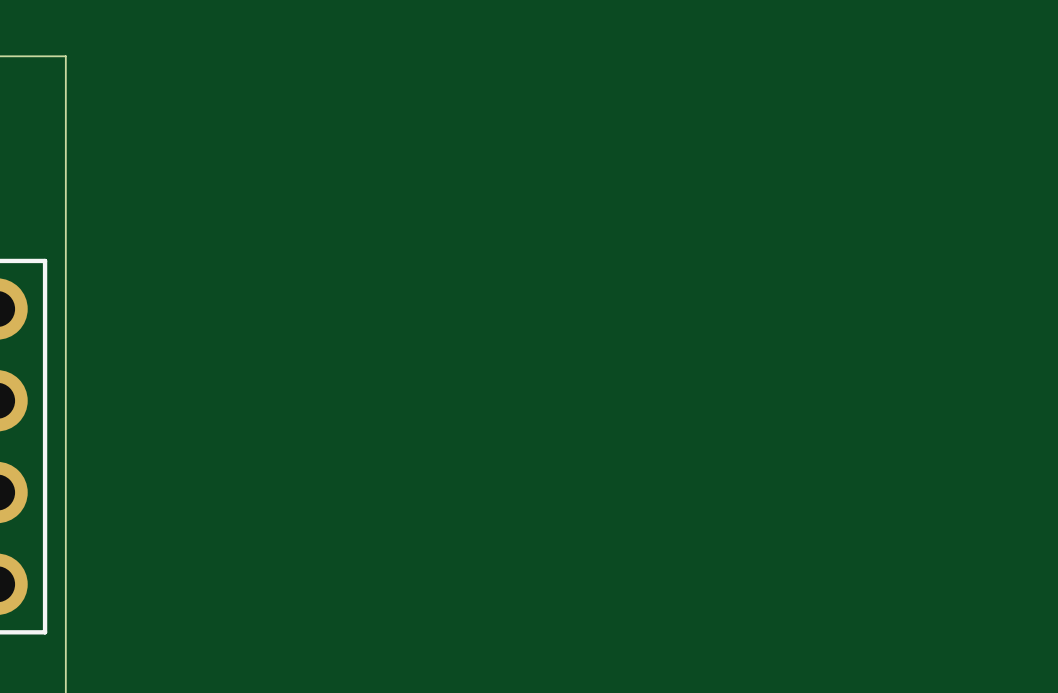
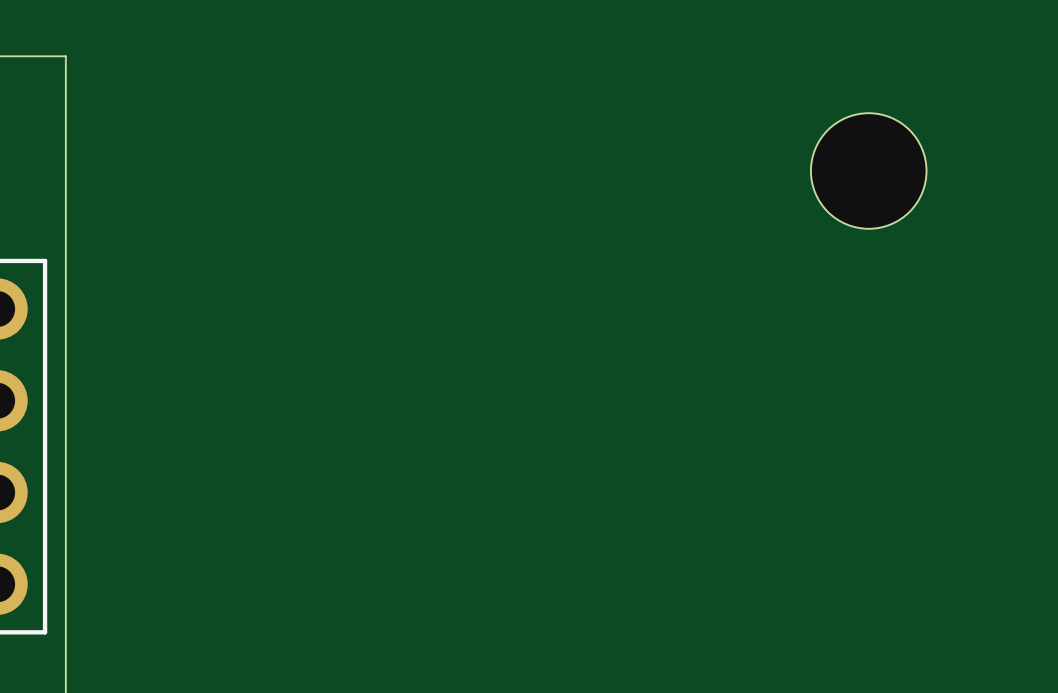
part: none -> (868, 171)

